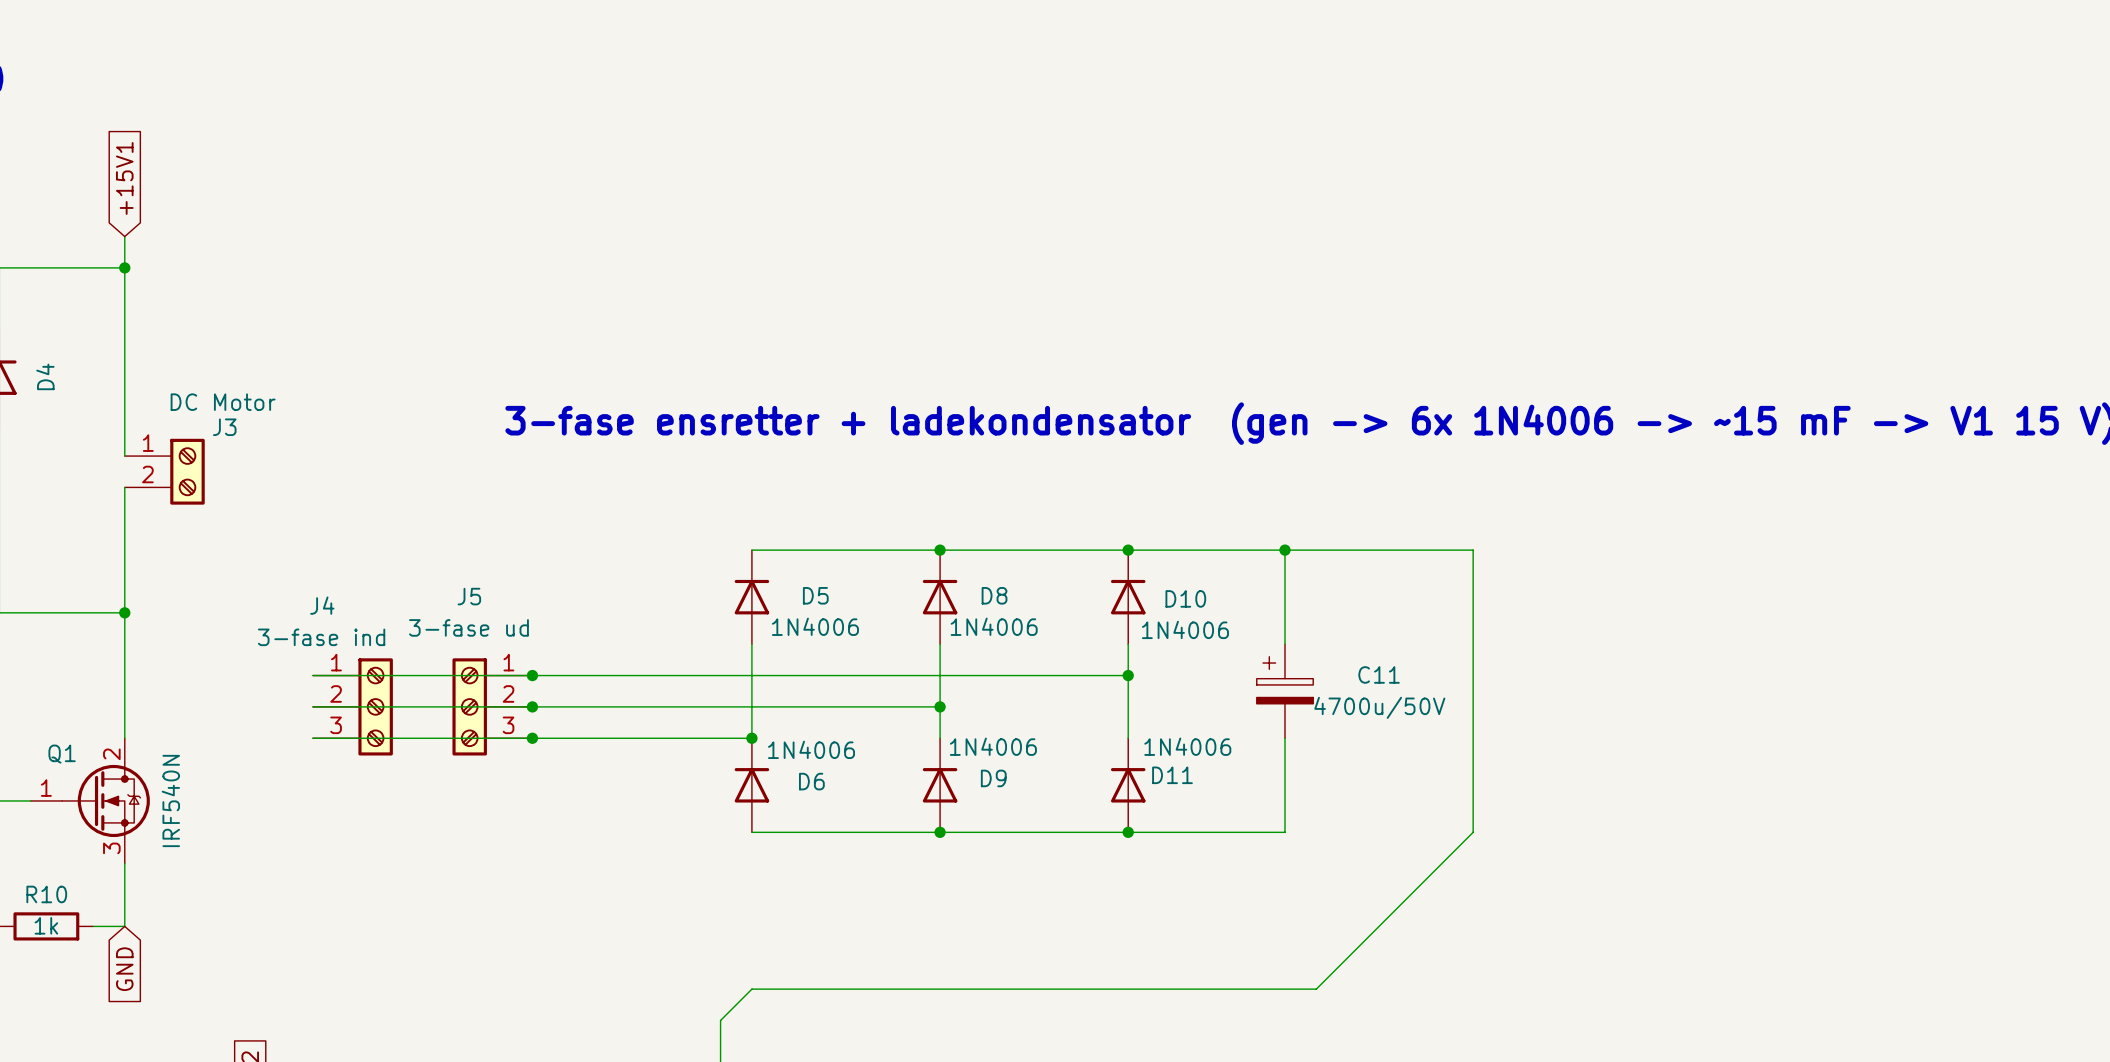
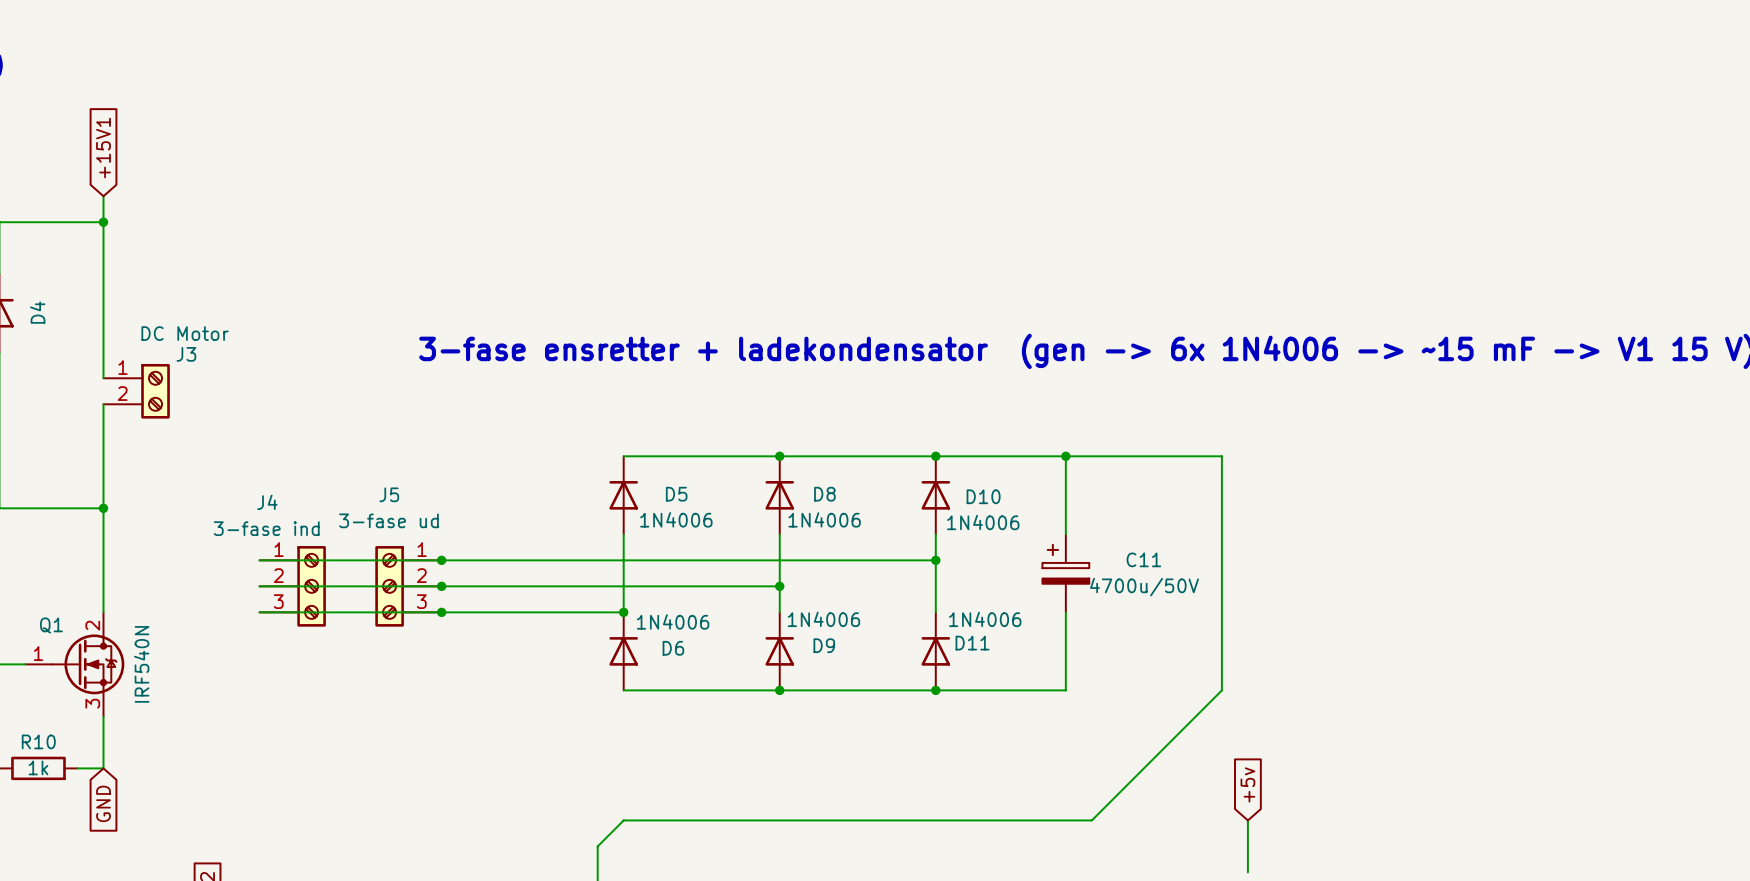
global label: none -> +5v (1247, 784)
wire: none -> (1247, 820) (1247, 872)

